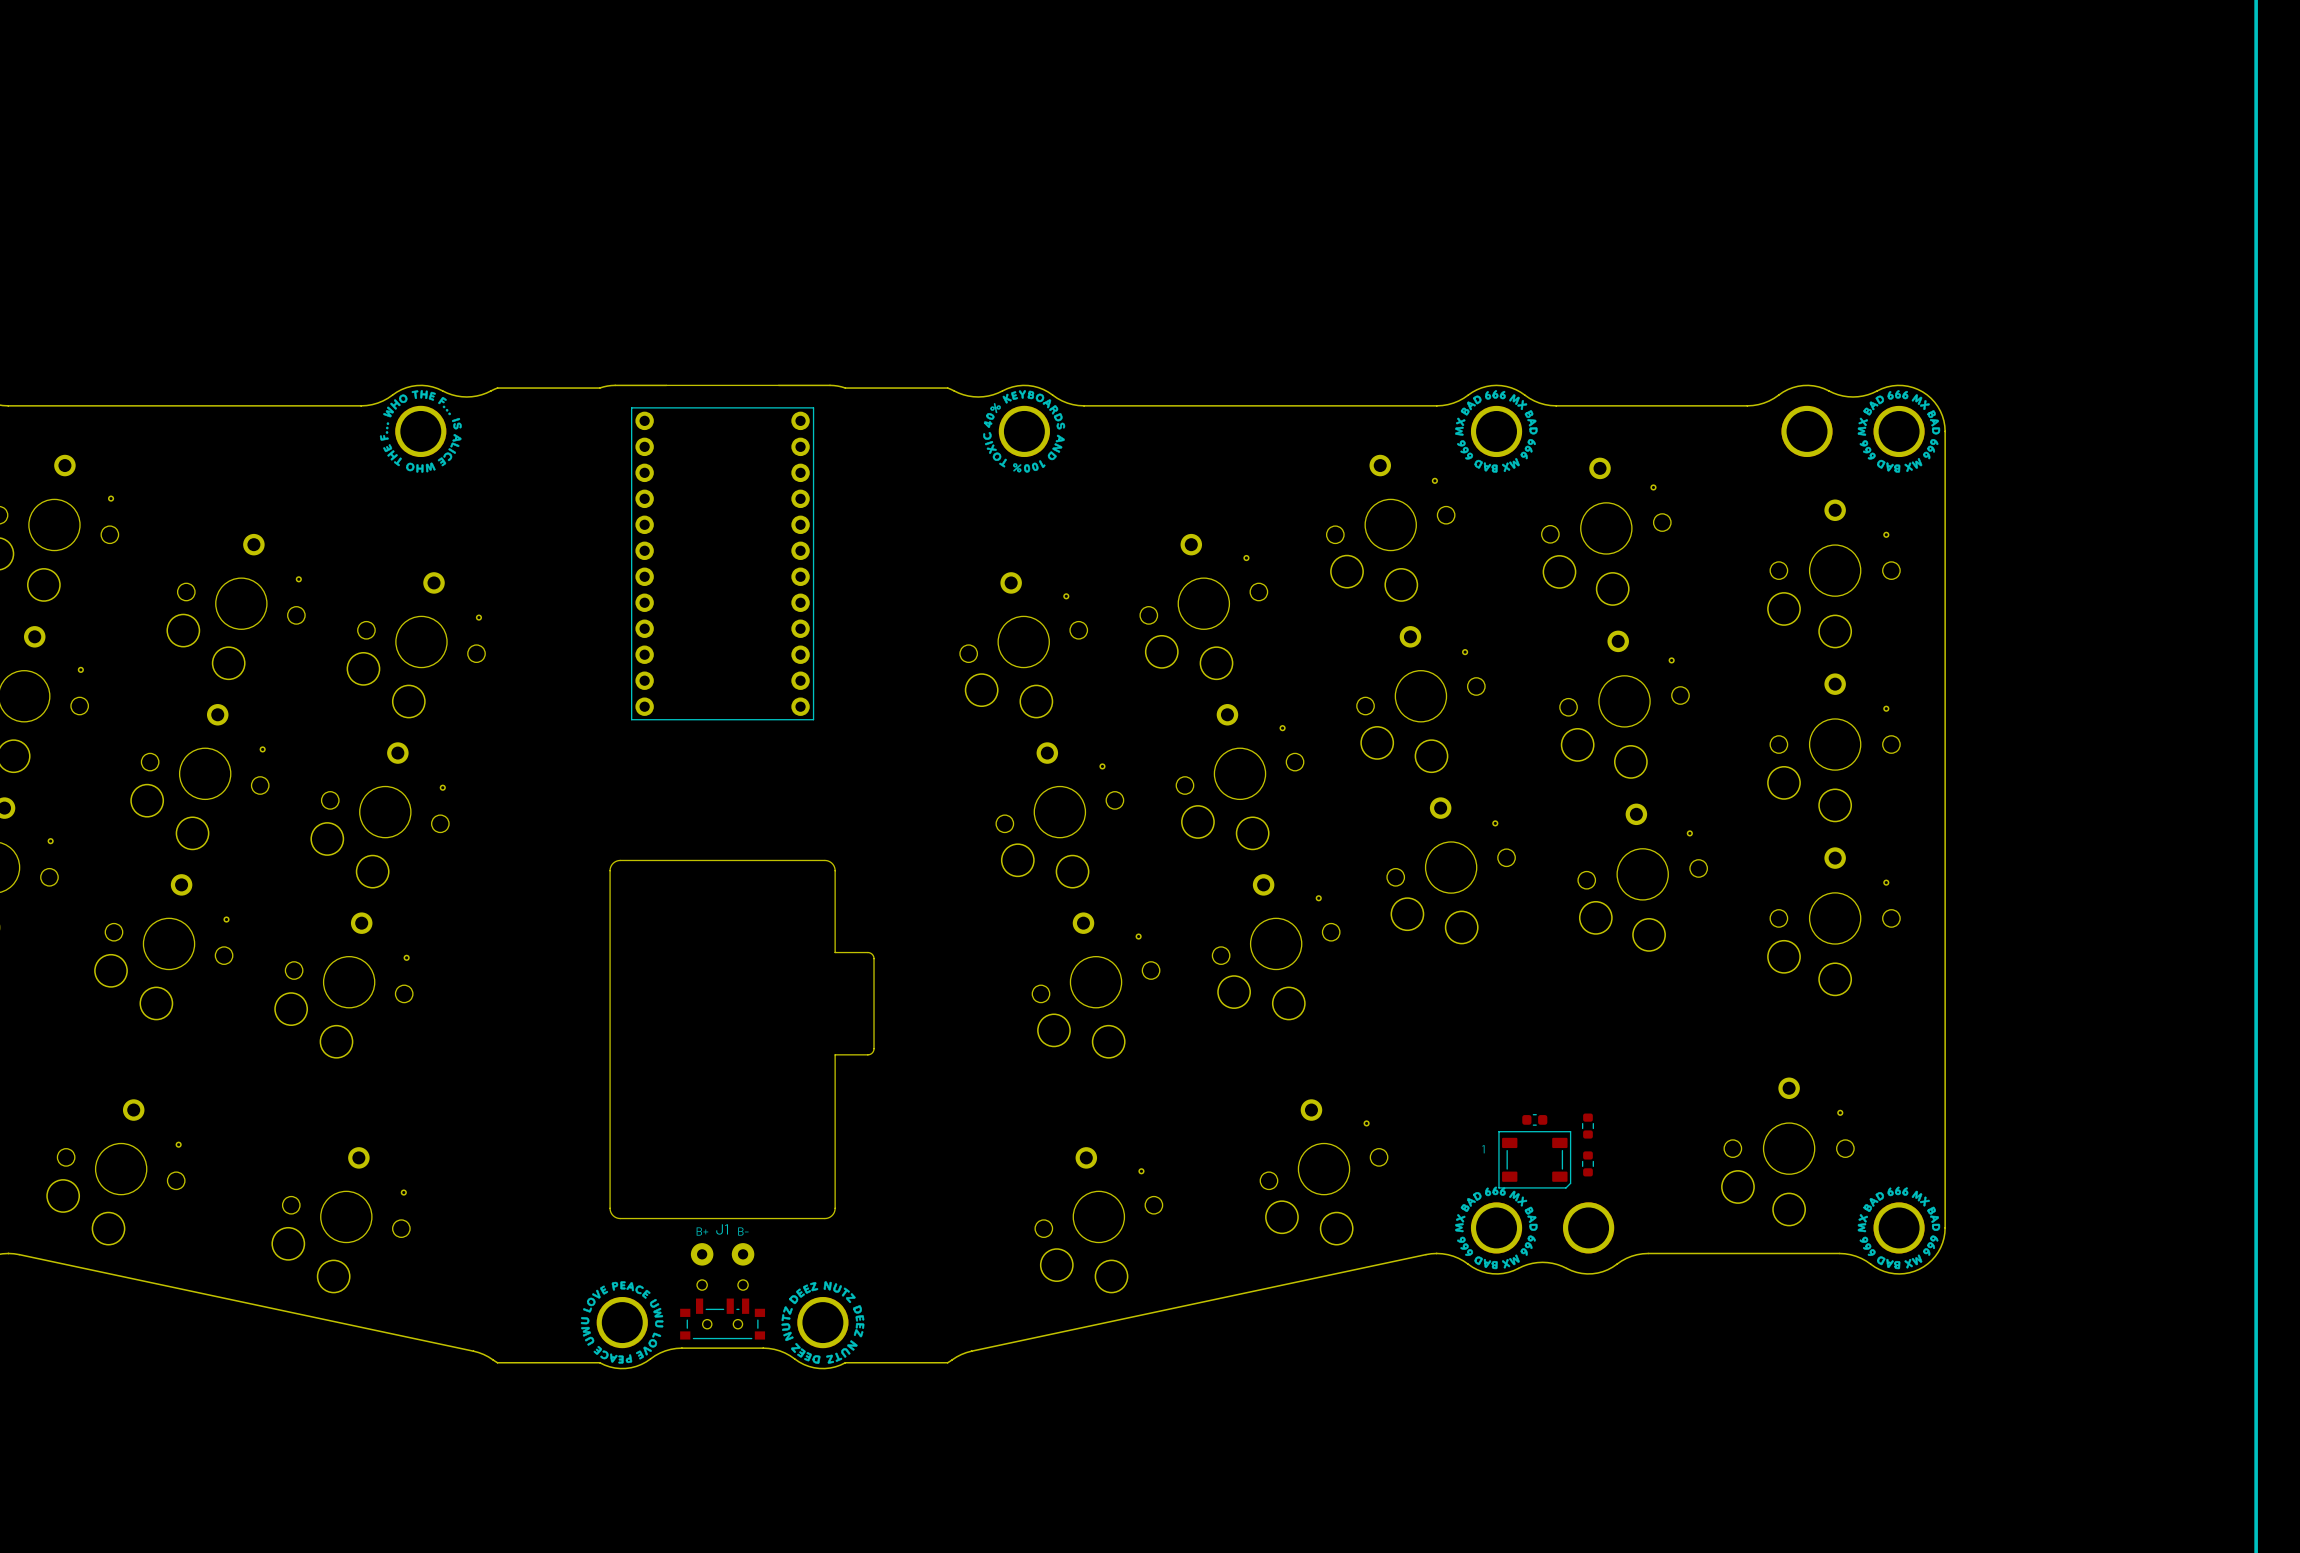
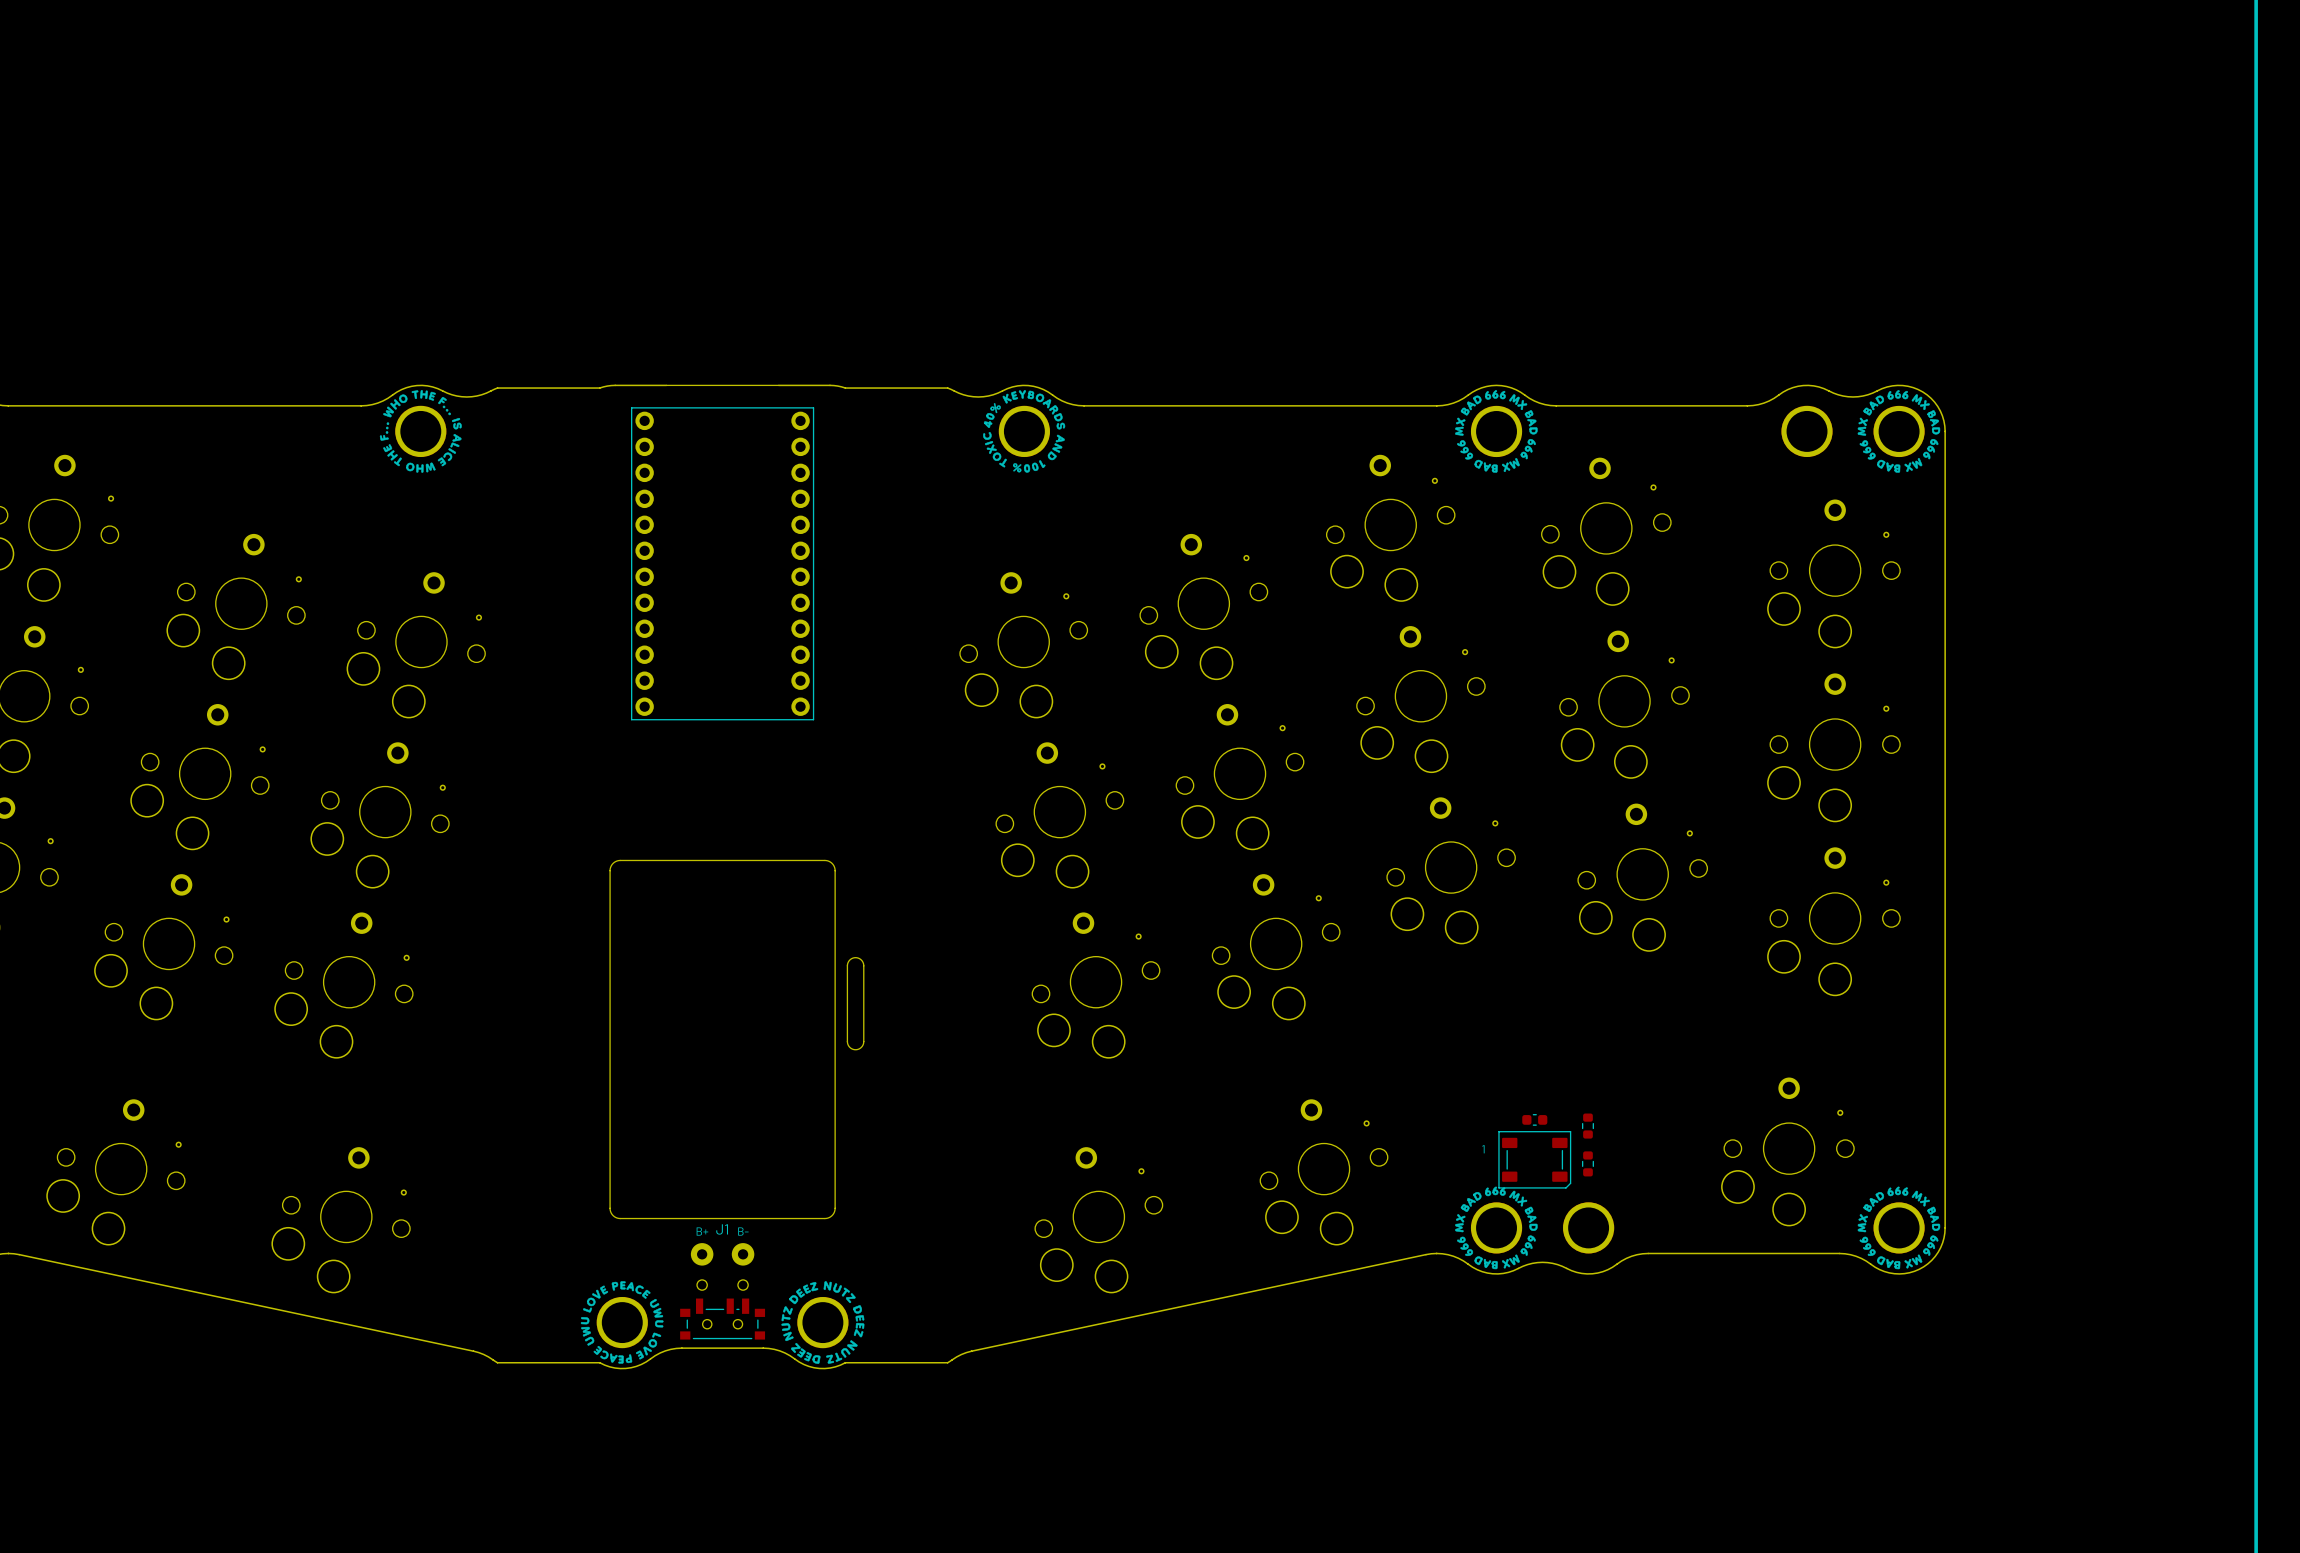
board edge: (835, 952) (868, 952) (872, 954) (874, 958) (873, 1051) (868, 1054) (835, 1054) -> (835, 952) (835, 1054)
board edge: none -> (847, 965) (847, 1042) (850, 1047) (856, 1049) (861, 1047) (863, 1042) (863, 964) (860, 959) (854, 957) (849, 960) (847, 965)

